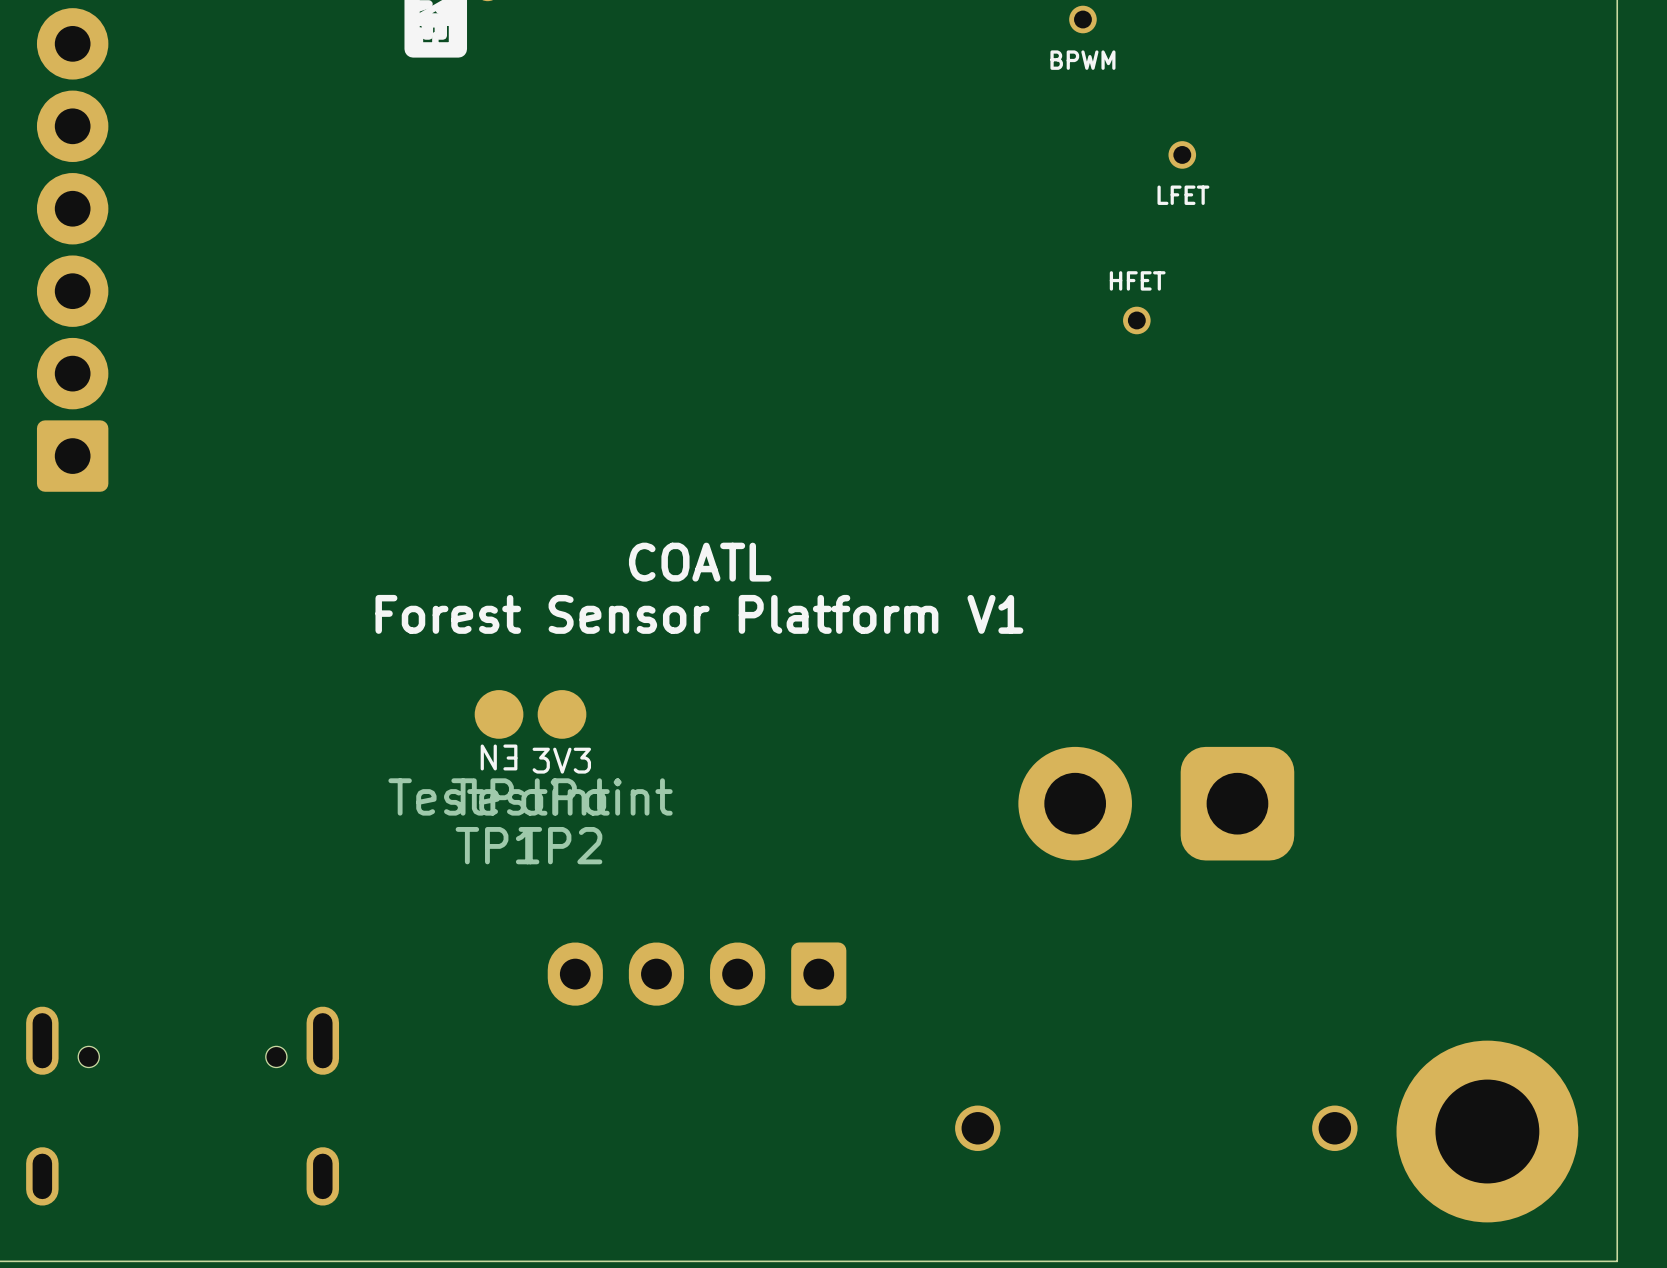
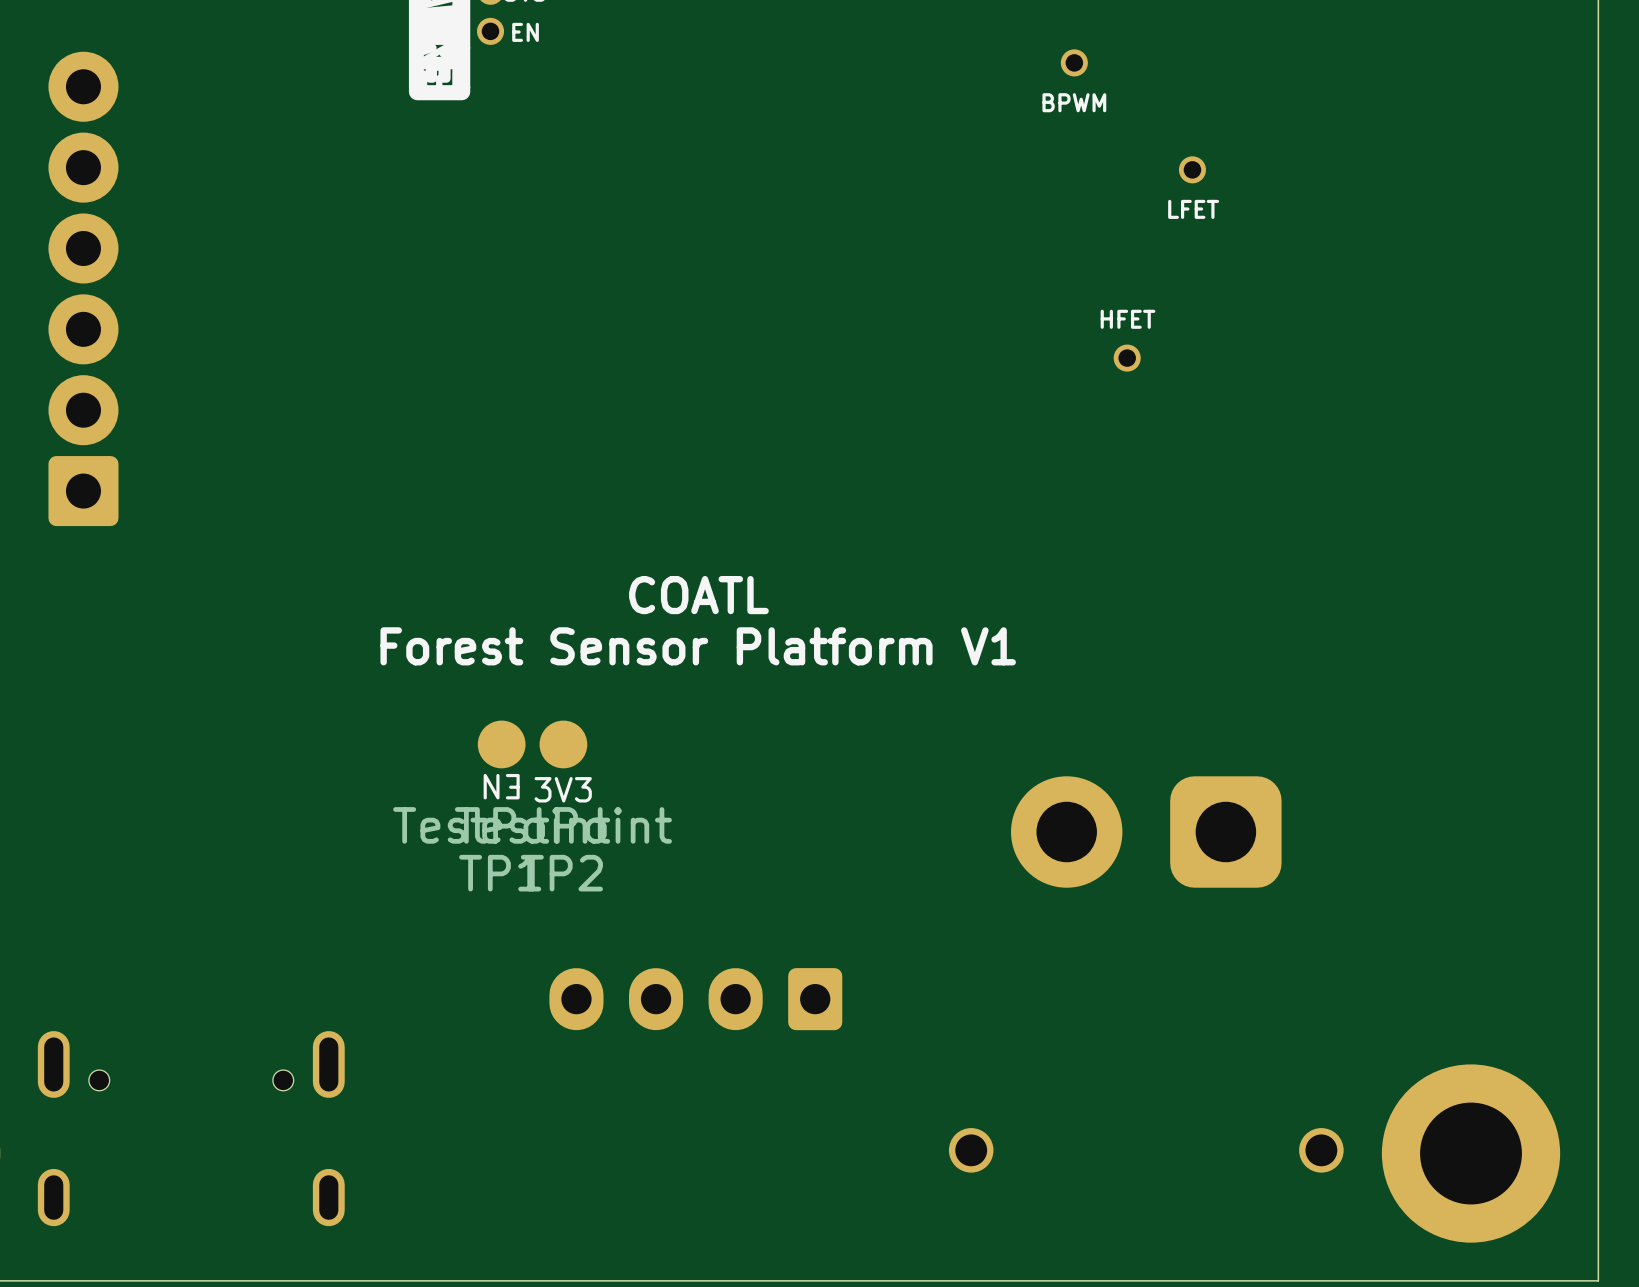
part position: (1182, 154) -> (1192, 169)

